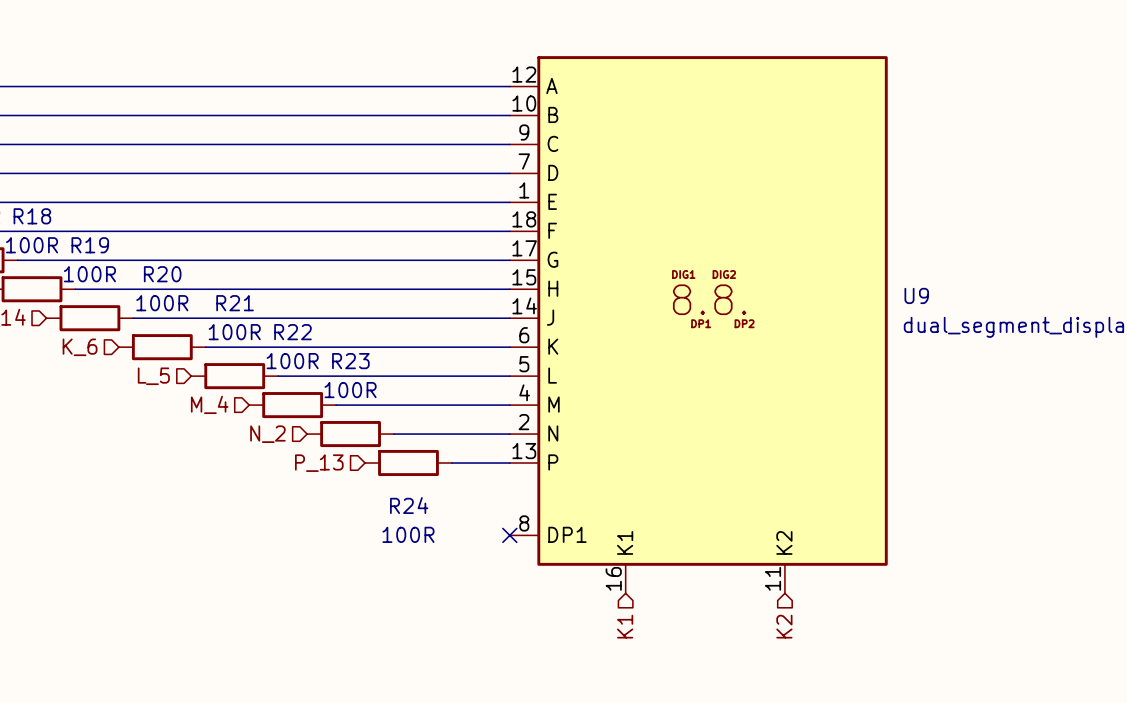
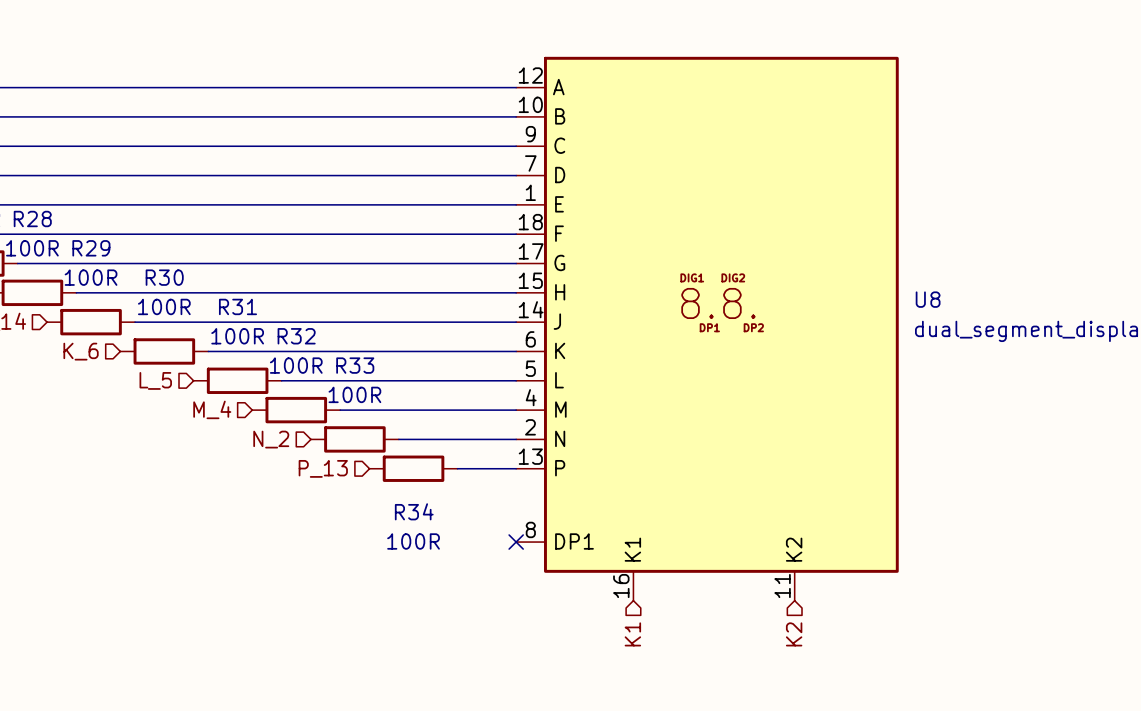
R18 name: R18 (32, 216) -> R28 (32, 218)
R19 name: R19 (90, 245) -> R29 (91, 248)
R20 name: R20 (162, 274) -> R30 (164, 277)
U9 name: U9 (916, 295) -> U8 (928, 299)
R21 name: R21 (235, 303) -> R31 (237, 306)
R22 name: R22 (292, 332) -> R32 (296, 336)
R23 name: R23 (350, 361) -> R33 (355, 365)
R24 name: R24 (409, 505) -> R34 (414, 511)

